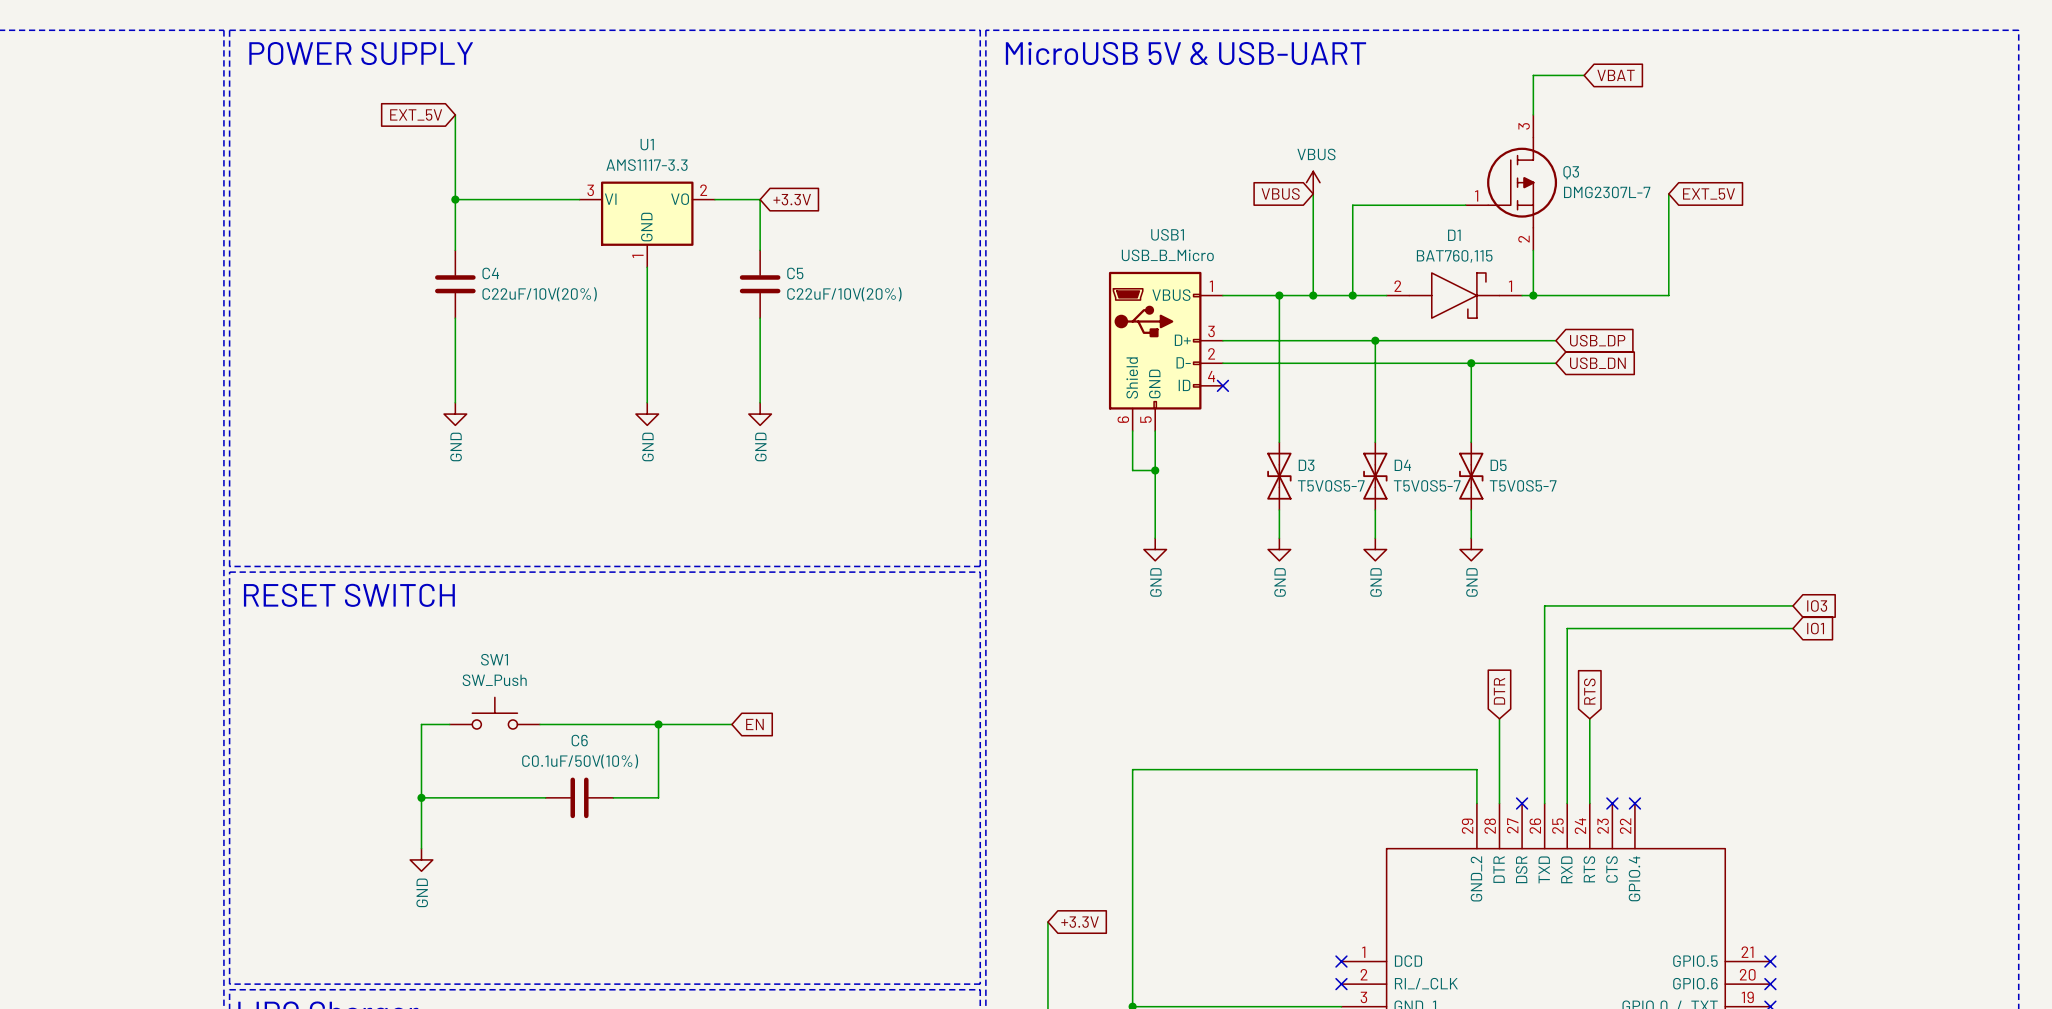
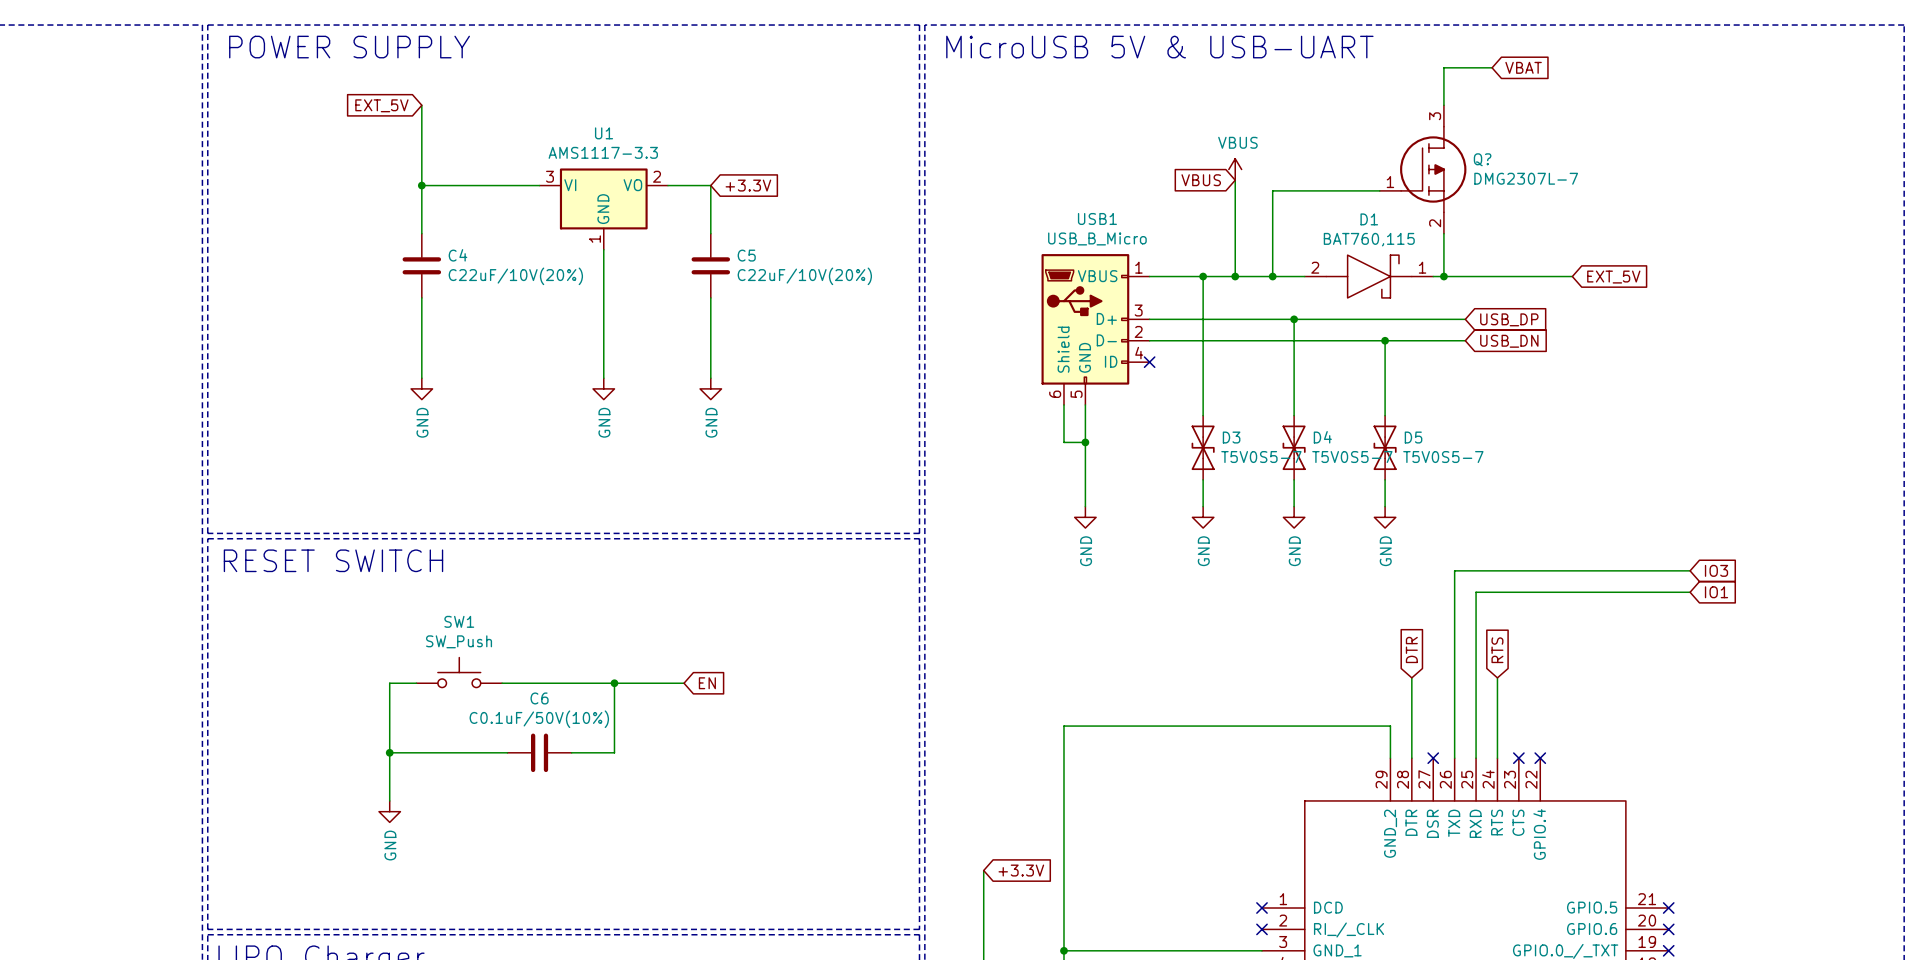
Q3 name: Q3 (1571, 172) -> Q? (1482, 159)
wire: (1668, 193) (1668, 295) -> none
global label position: EXT_5V (1709, 194) -> EXT_5V (1613, 277)

